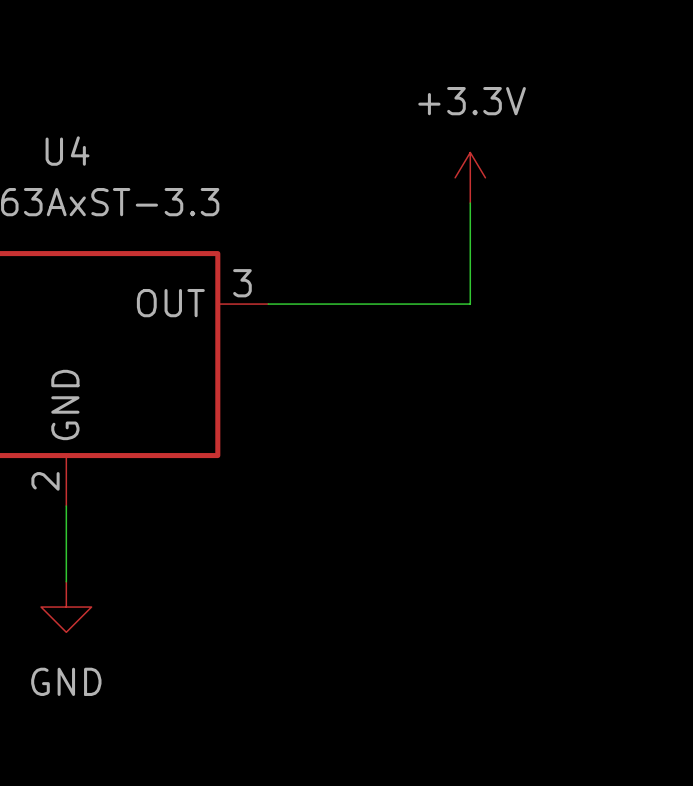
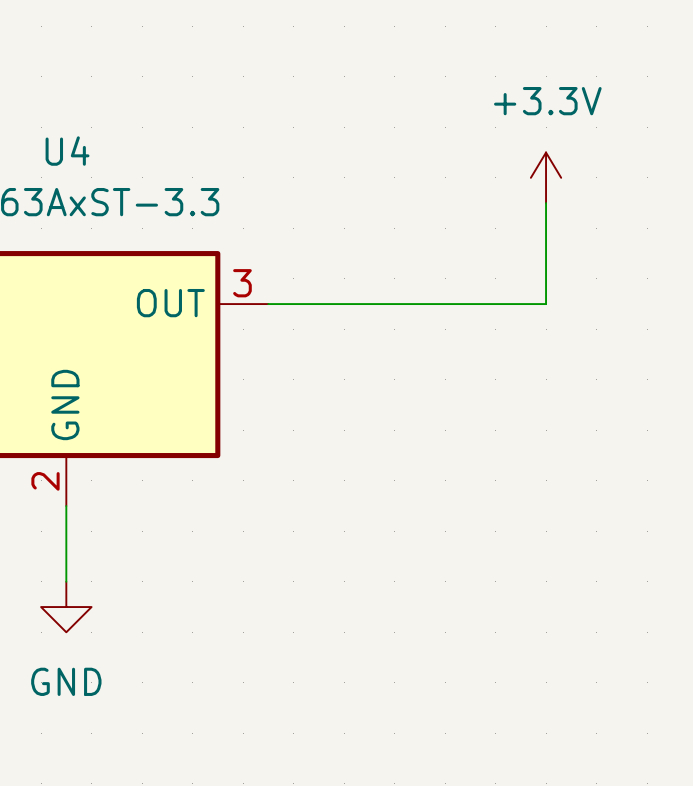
power symbol position: +3.3V (470, 177) -> +3.3V (546, 177)
wire: (470, 203) (470, 304) -> (546, 203) (546, 304) (470, 304)

